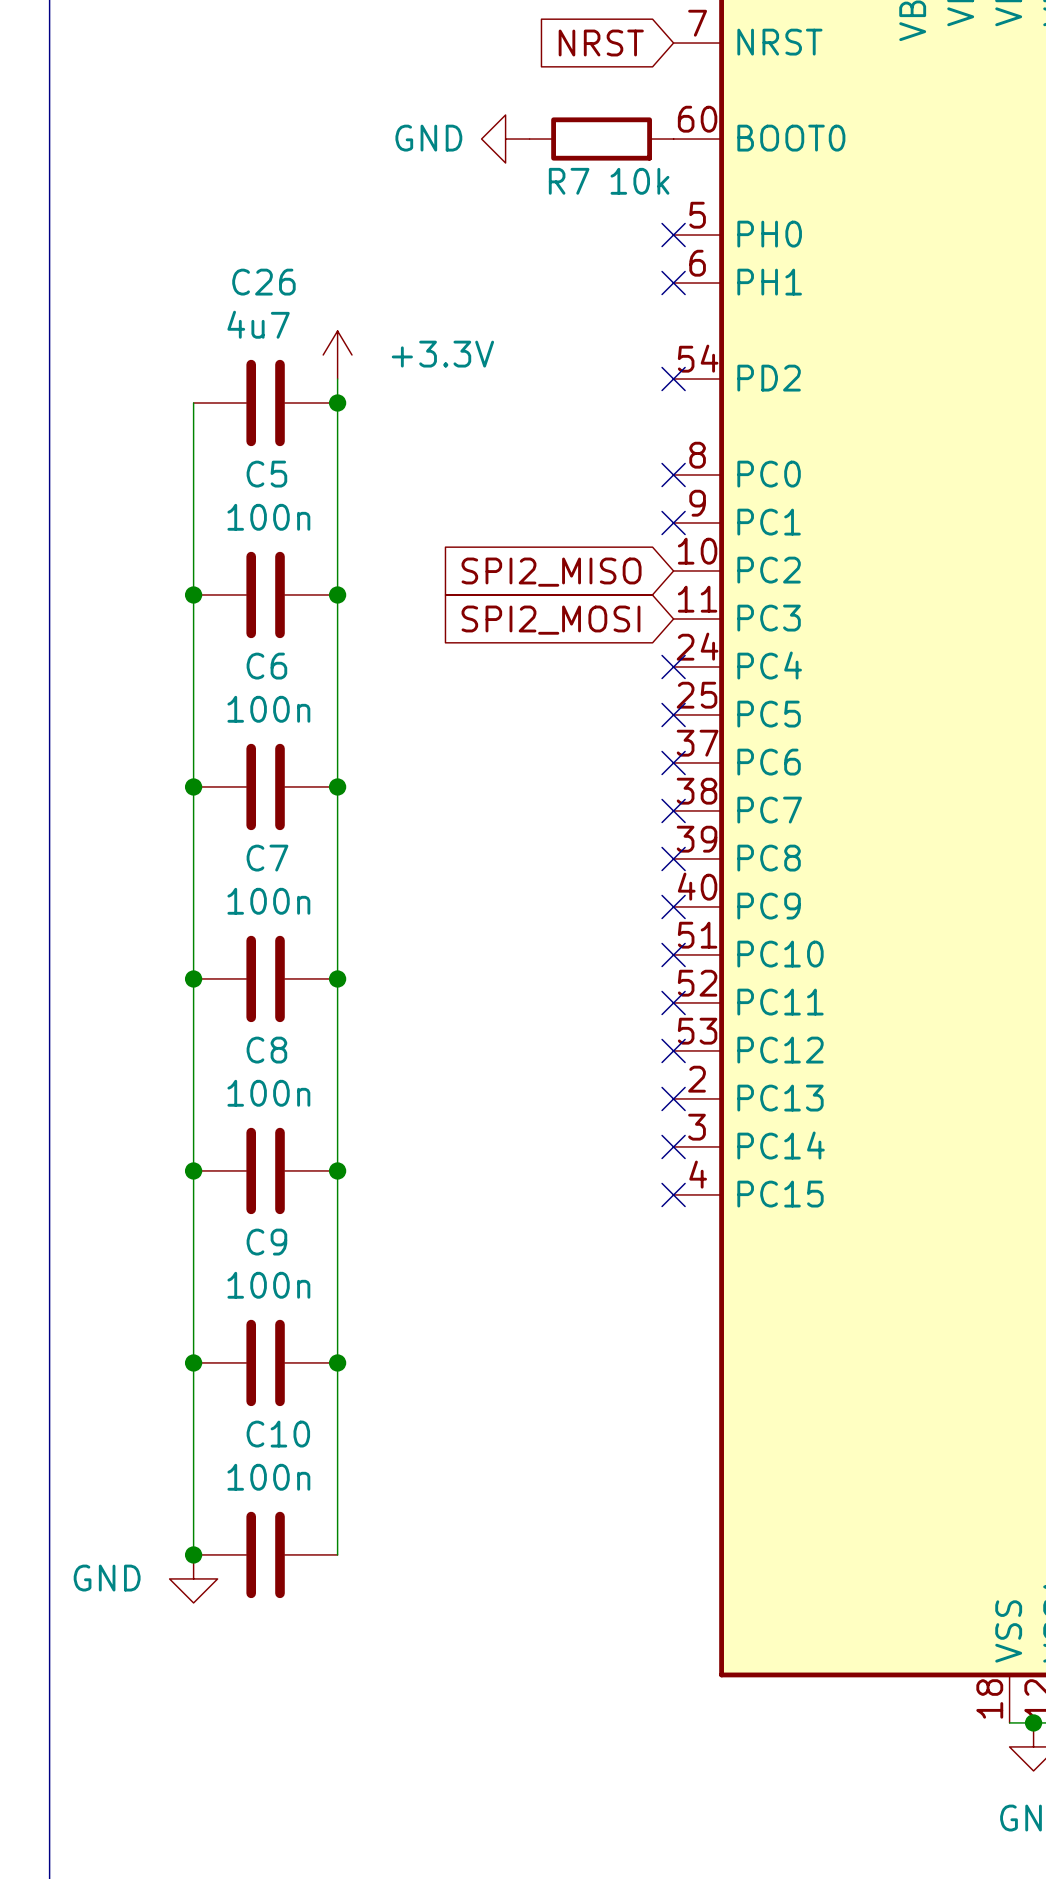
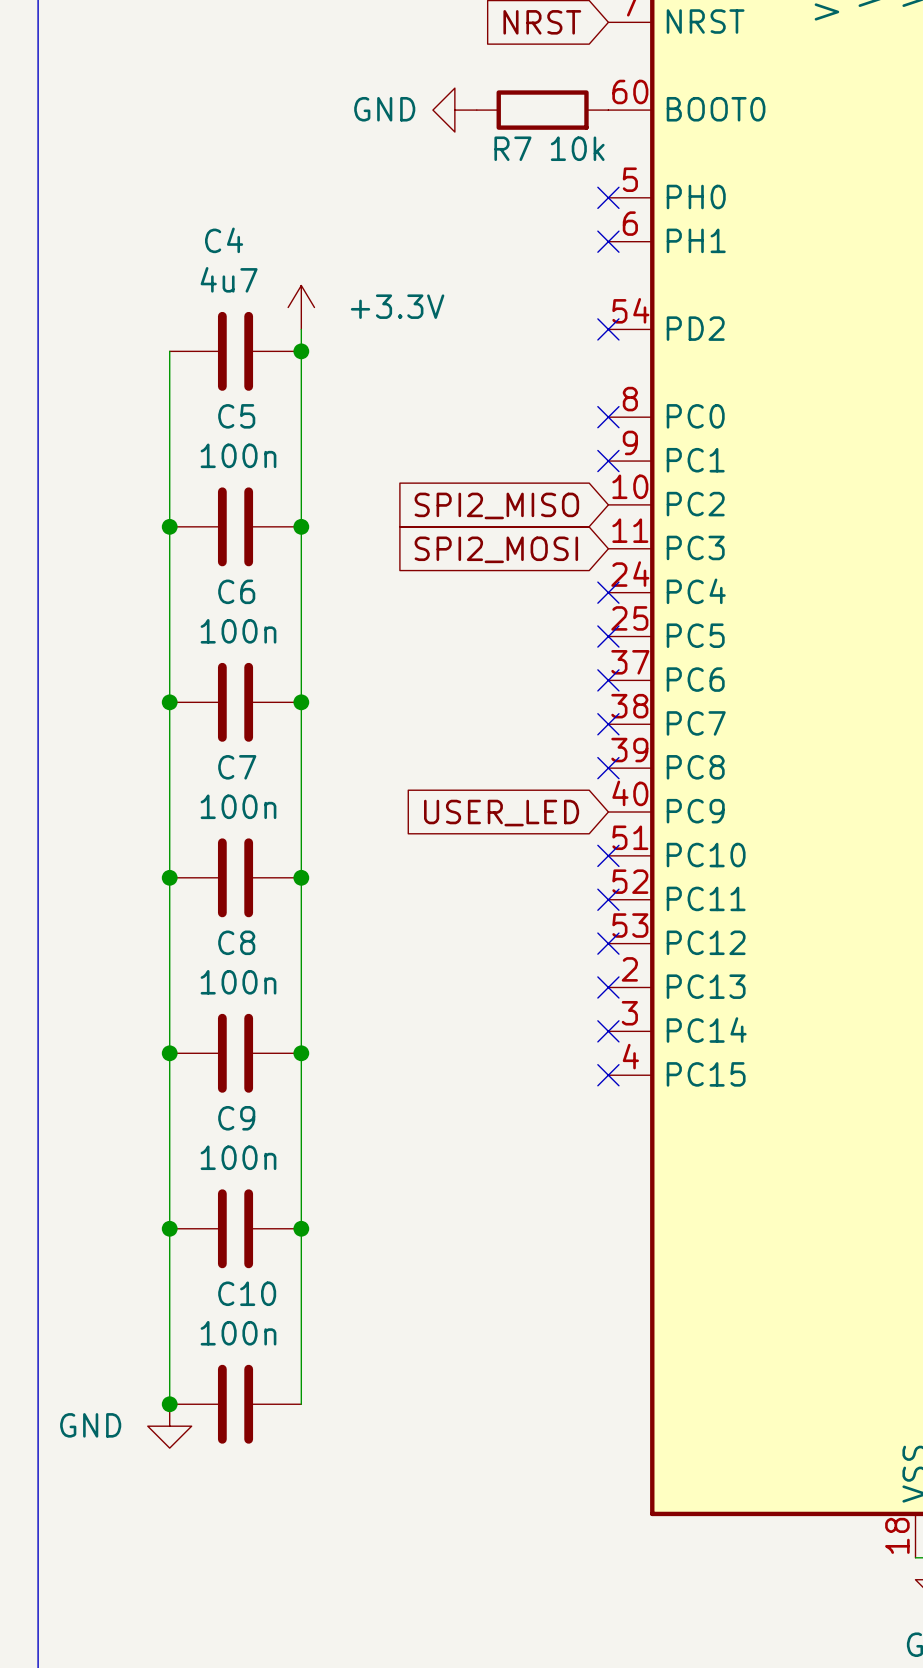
C26 name: C26 (263, 282) -> C4 (224, 240)
no-connect mark: (673, 906) -> none
global label: none -> USER_LED (501, 813)

